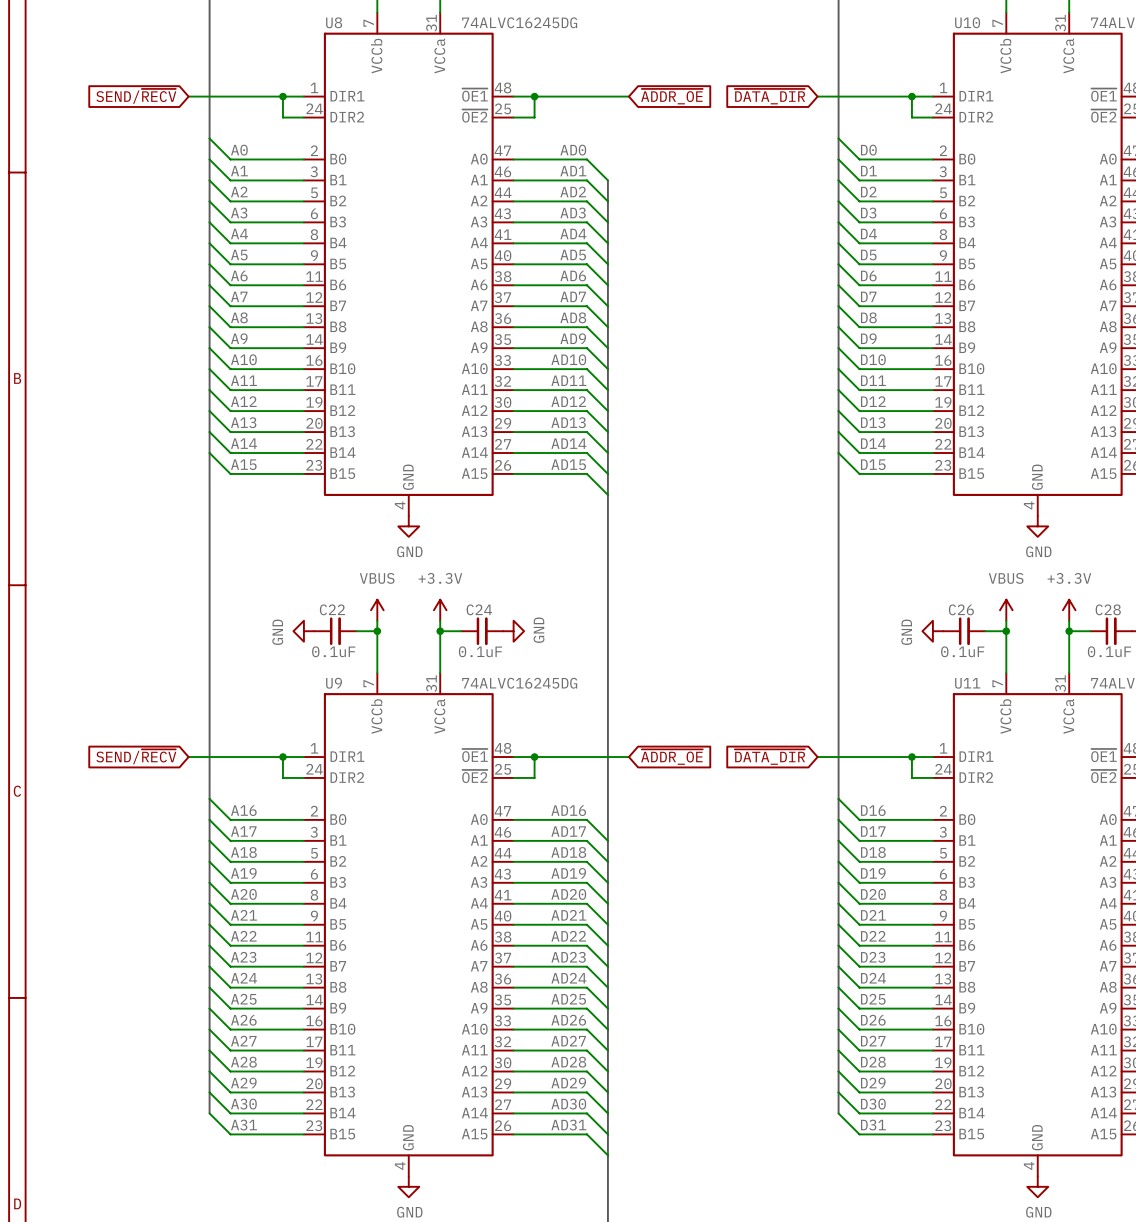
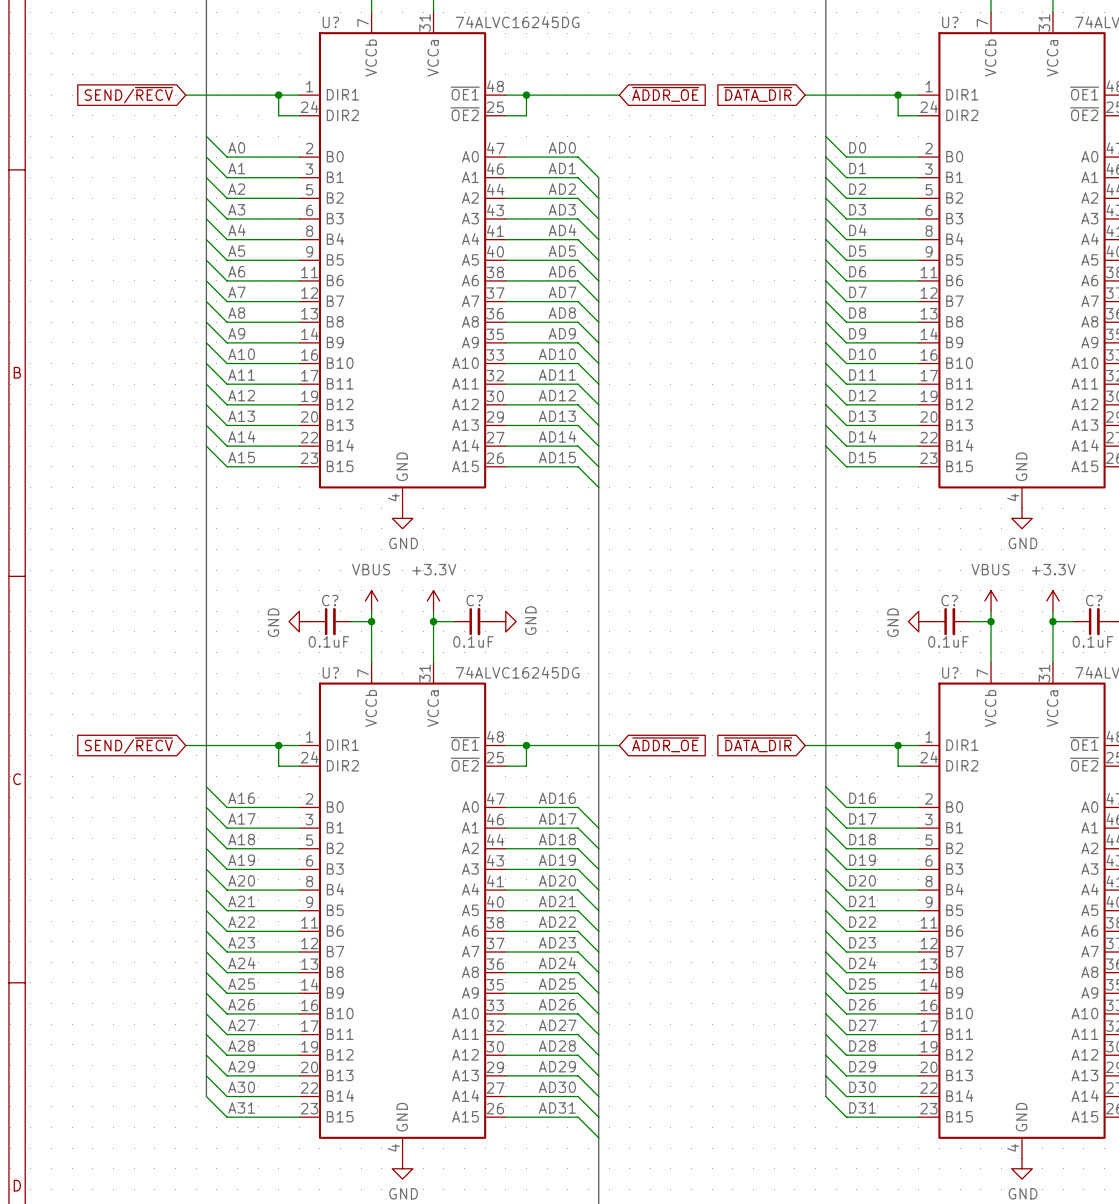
U8 name: U8 (334, 22) -> U? (330, 22)
U10 name: U10 (967, 22) -> U? (950, 22)
C22 name: C22 (332, 609) -> C? (330, 600)
C24 name: C24 (479, 609) -> C? (474, 600)
C26 name: C26 (961, 609) -> C? (949, 600)
C28 name: C28 (1108, 609) -> C? (1094, 600)
U9 name: U9 (334, 683) -> U? (330, 672)
U11 name: U11 (967, 683) -> U? (950, 672)

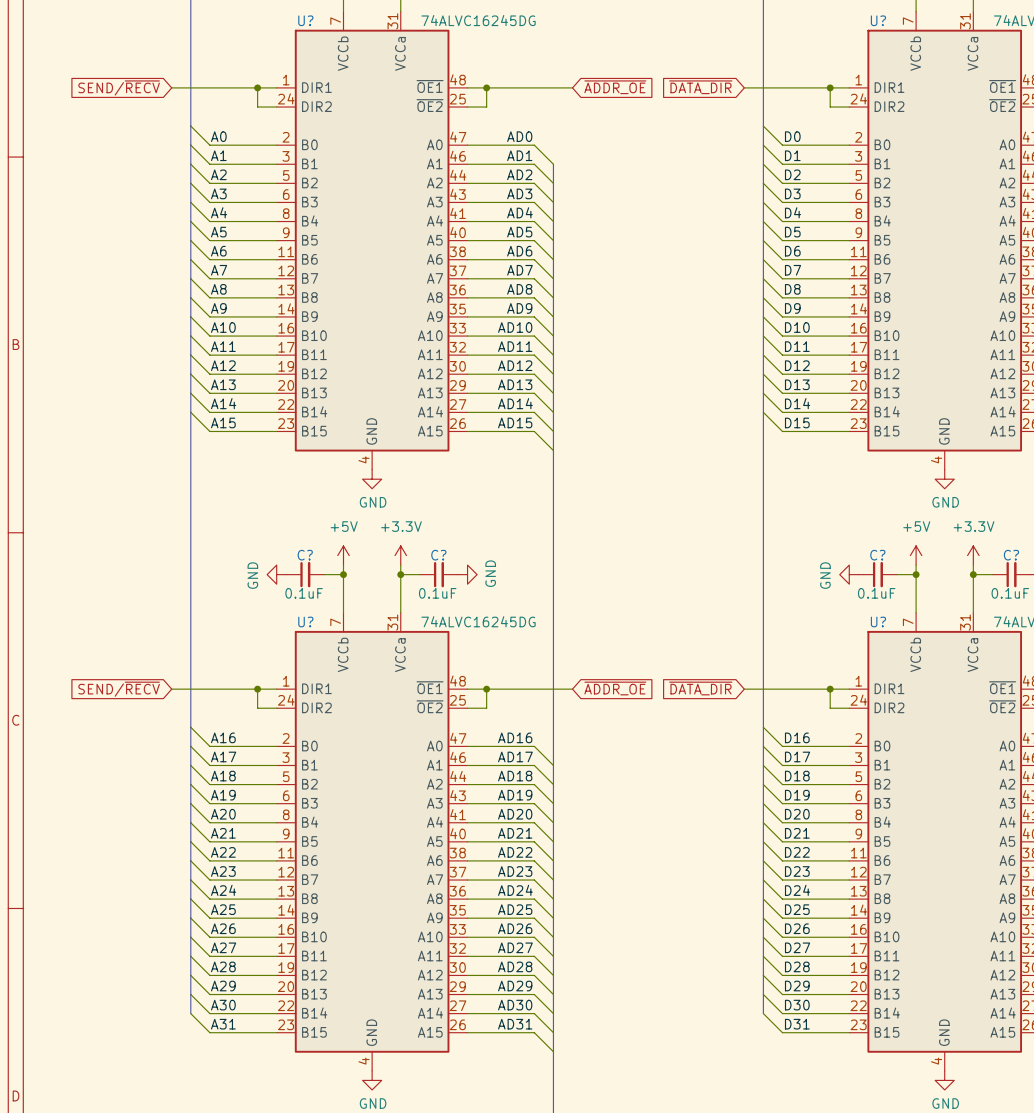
power symbol: VBUS (371, 600) -> +5V (343, 555)
power symbol: VBUS (991, 600) -> +5V (916, 555)

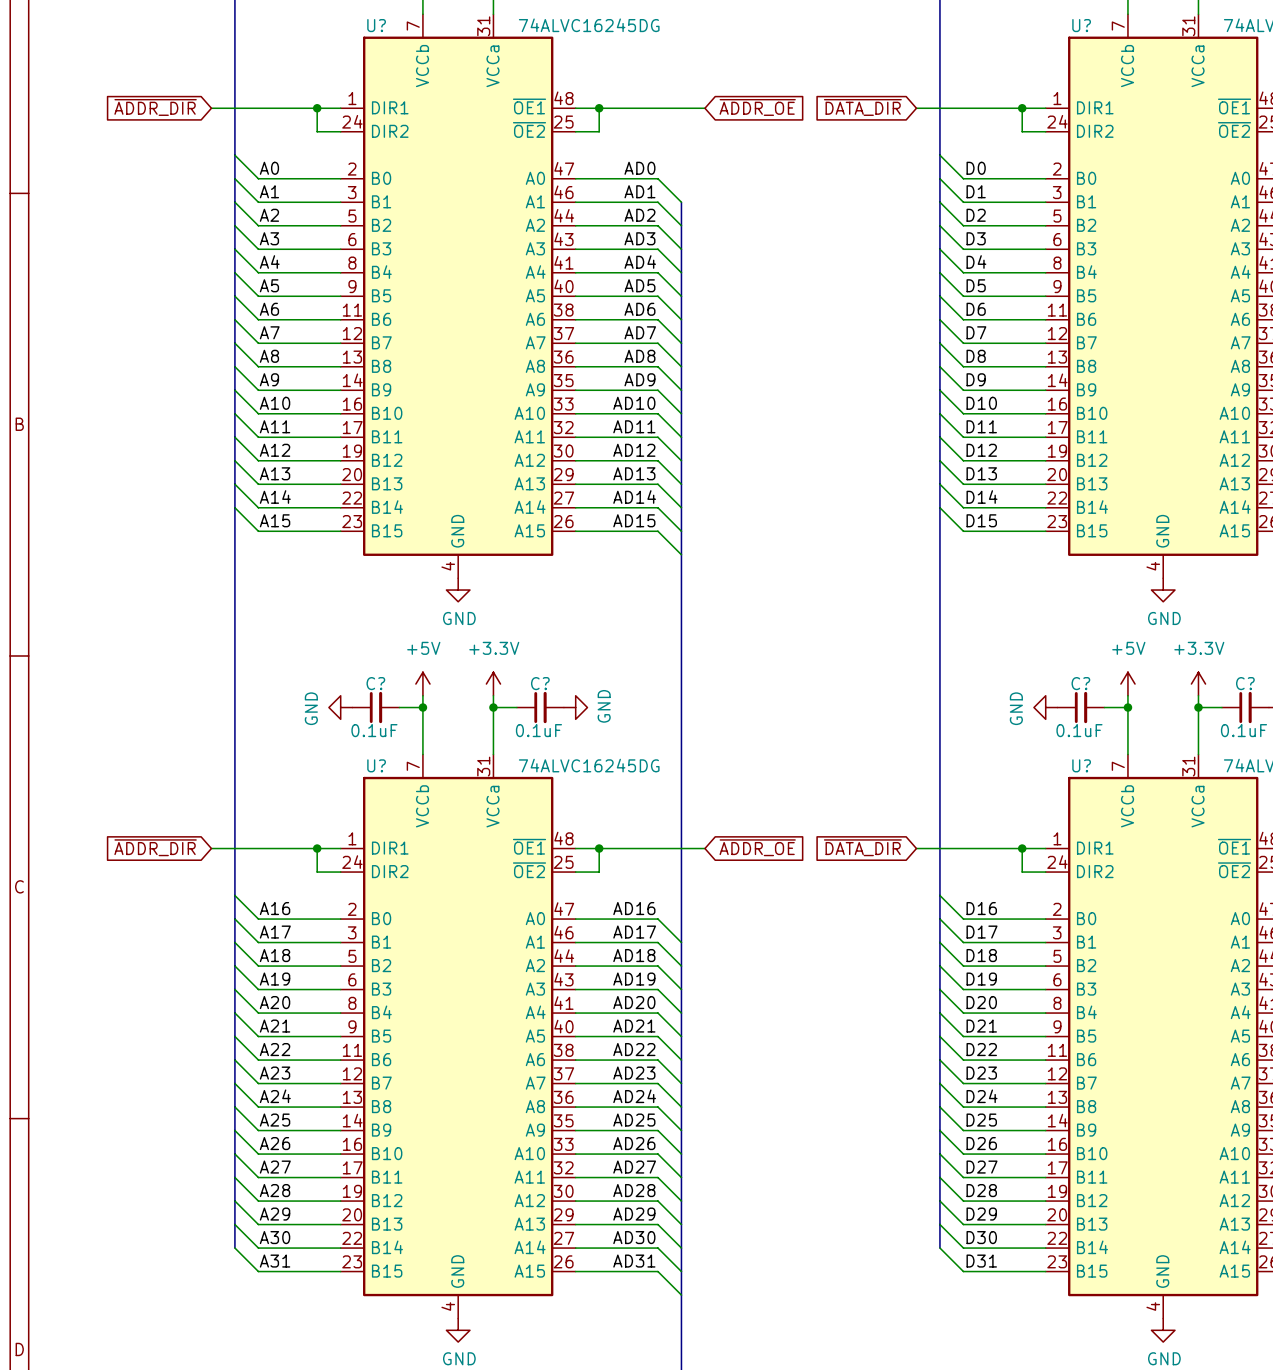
global label: SEND/~{RECV} (119, 87) -> ~{ADDR_DIR} (155, 107)
global label: SEND/~{RECV} (119, 689) -> ~{ADDR_DIR} (155, 847)

